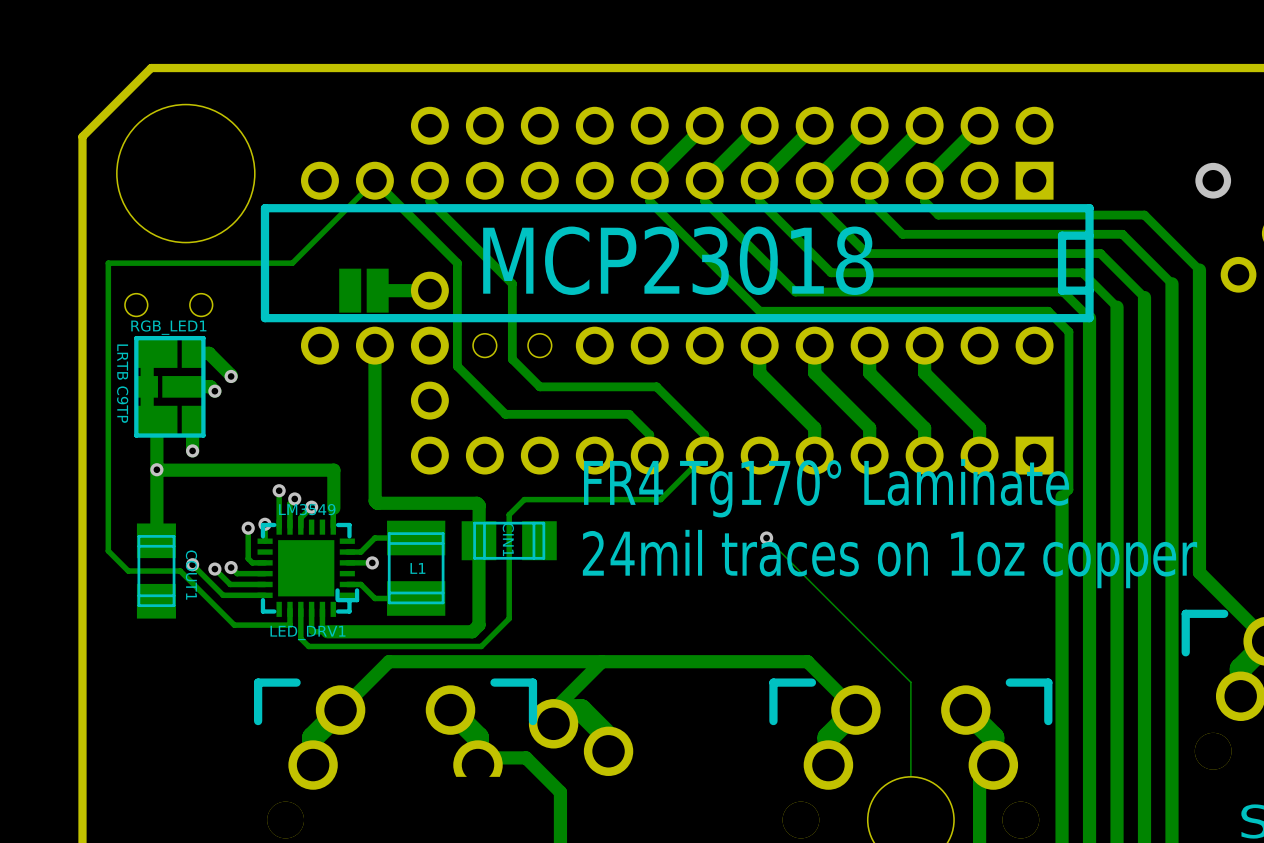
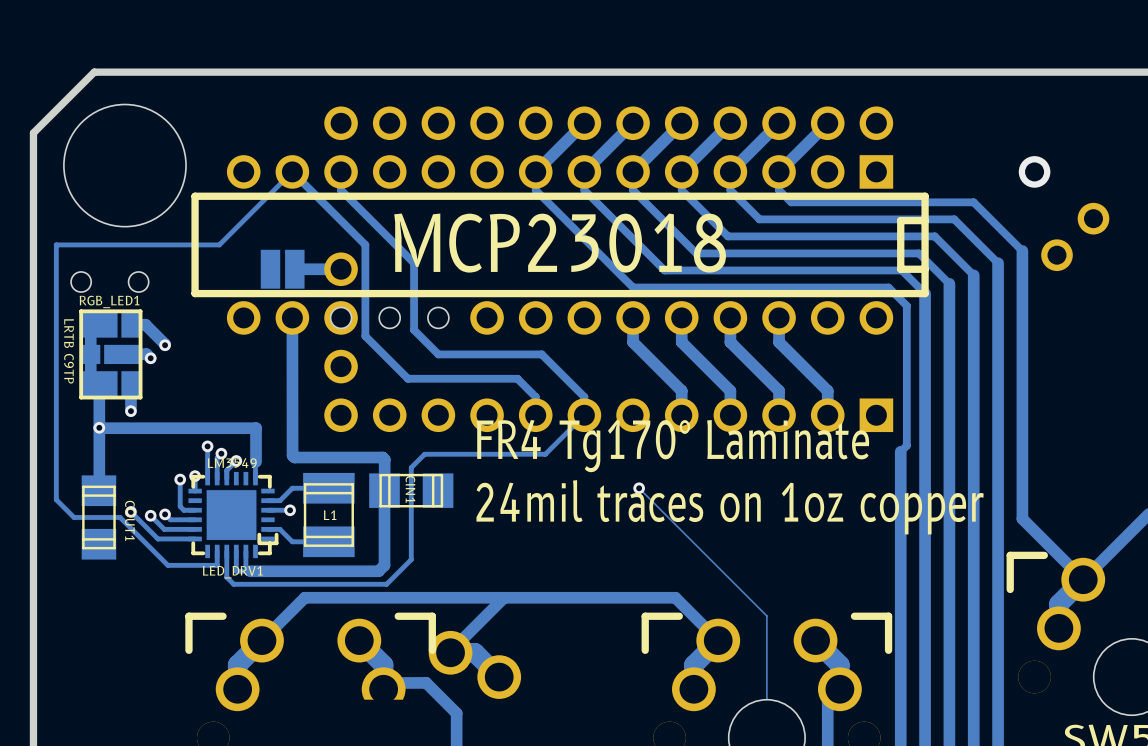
track: (601, 661) (553, 710) (581, 710) (608, 737) -> none
track: none -> (504, 597) (450, 651) (474, 652) (499, 677)

